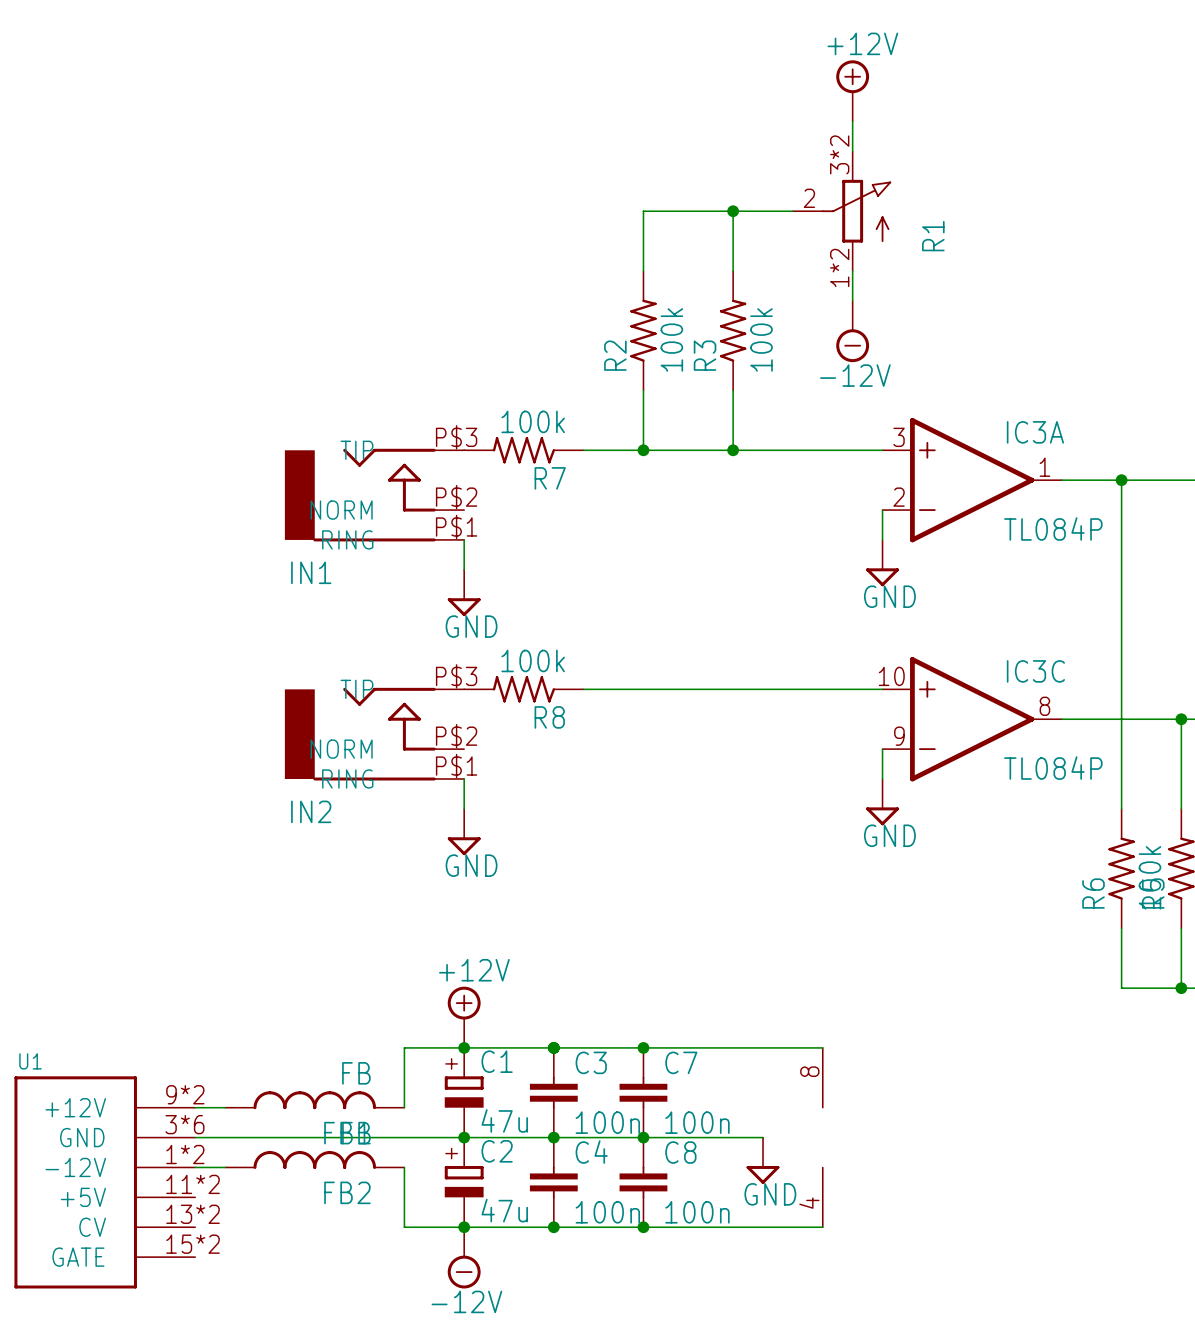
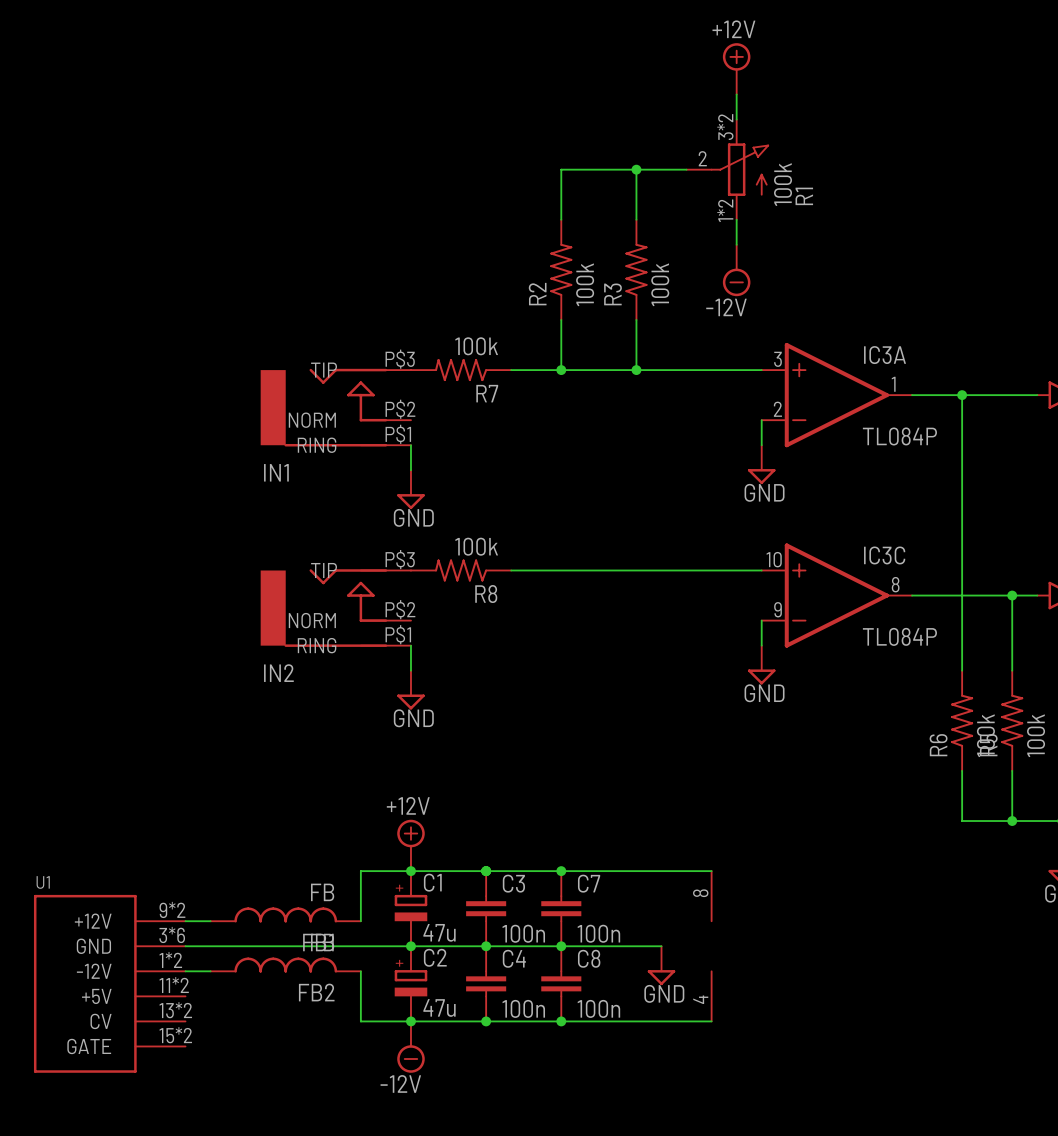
R1 value: none -> 100k (783, 184)

